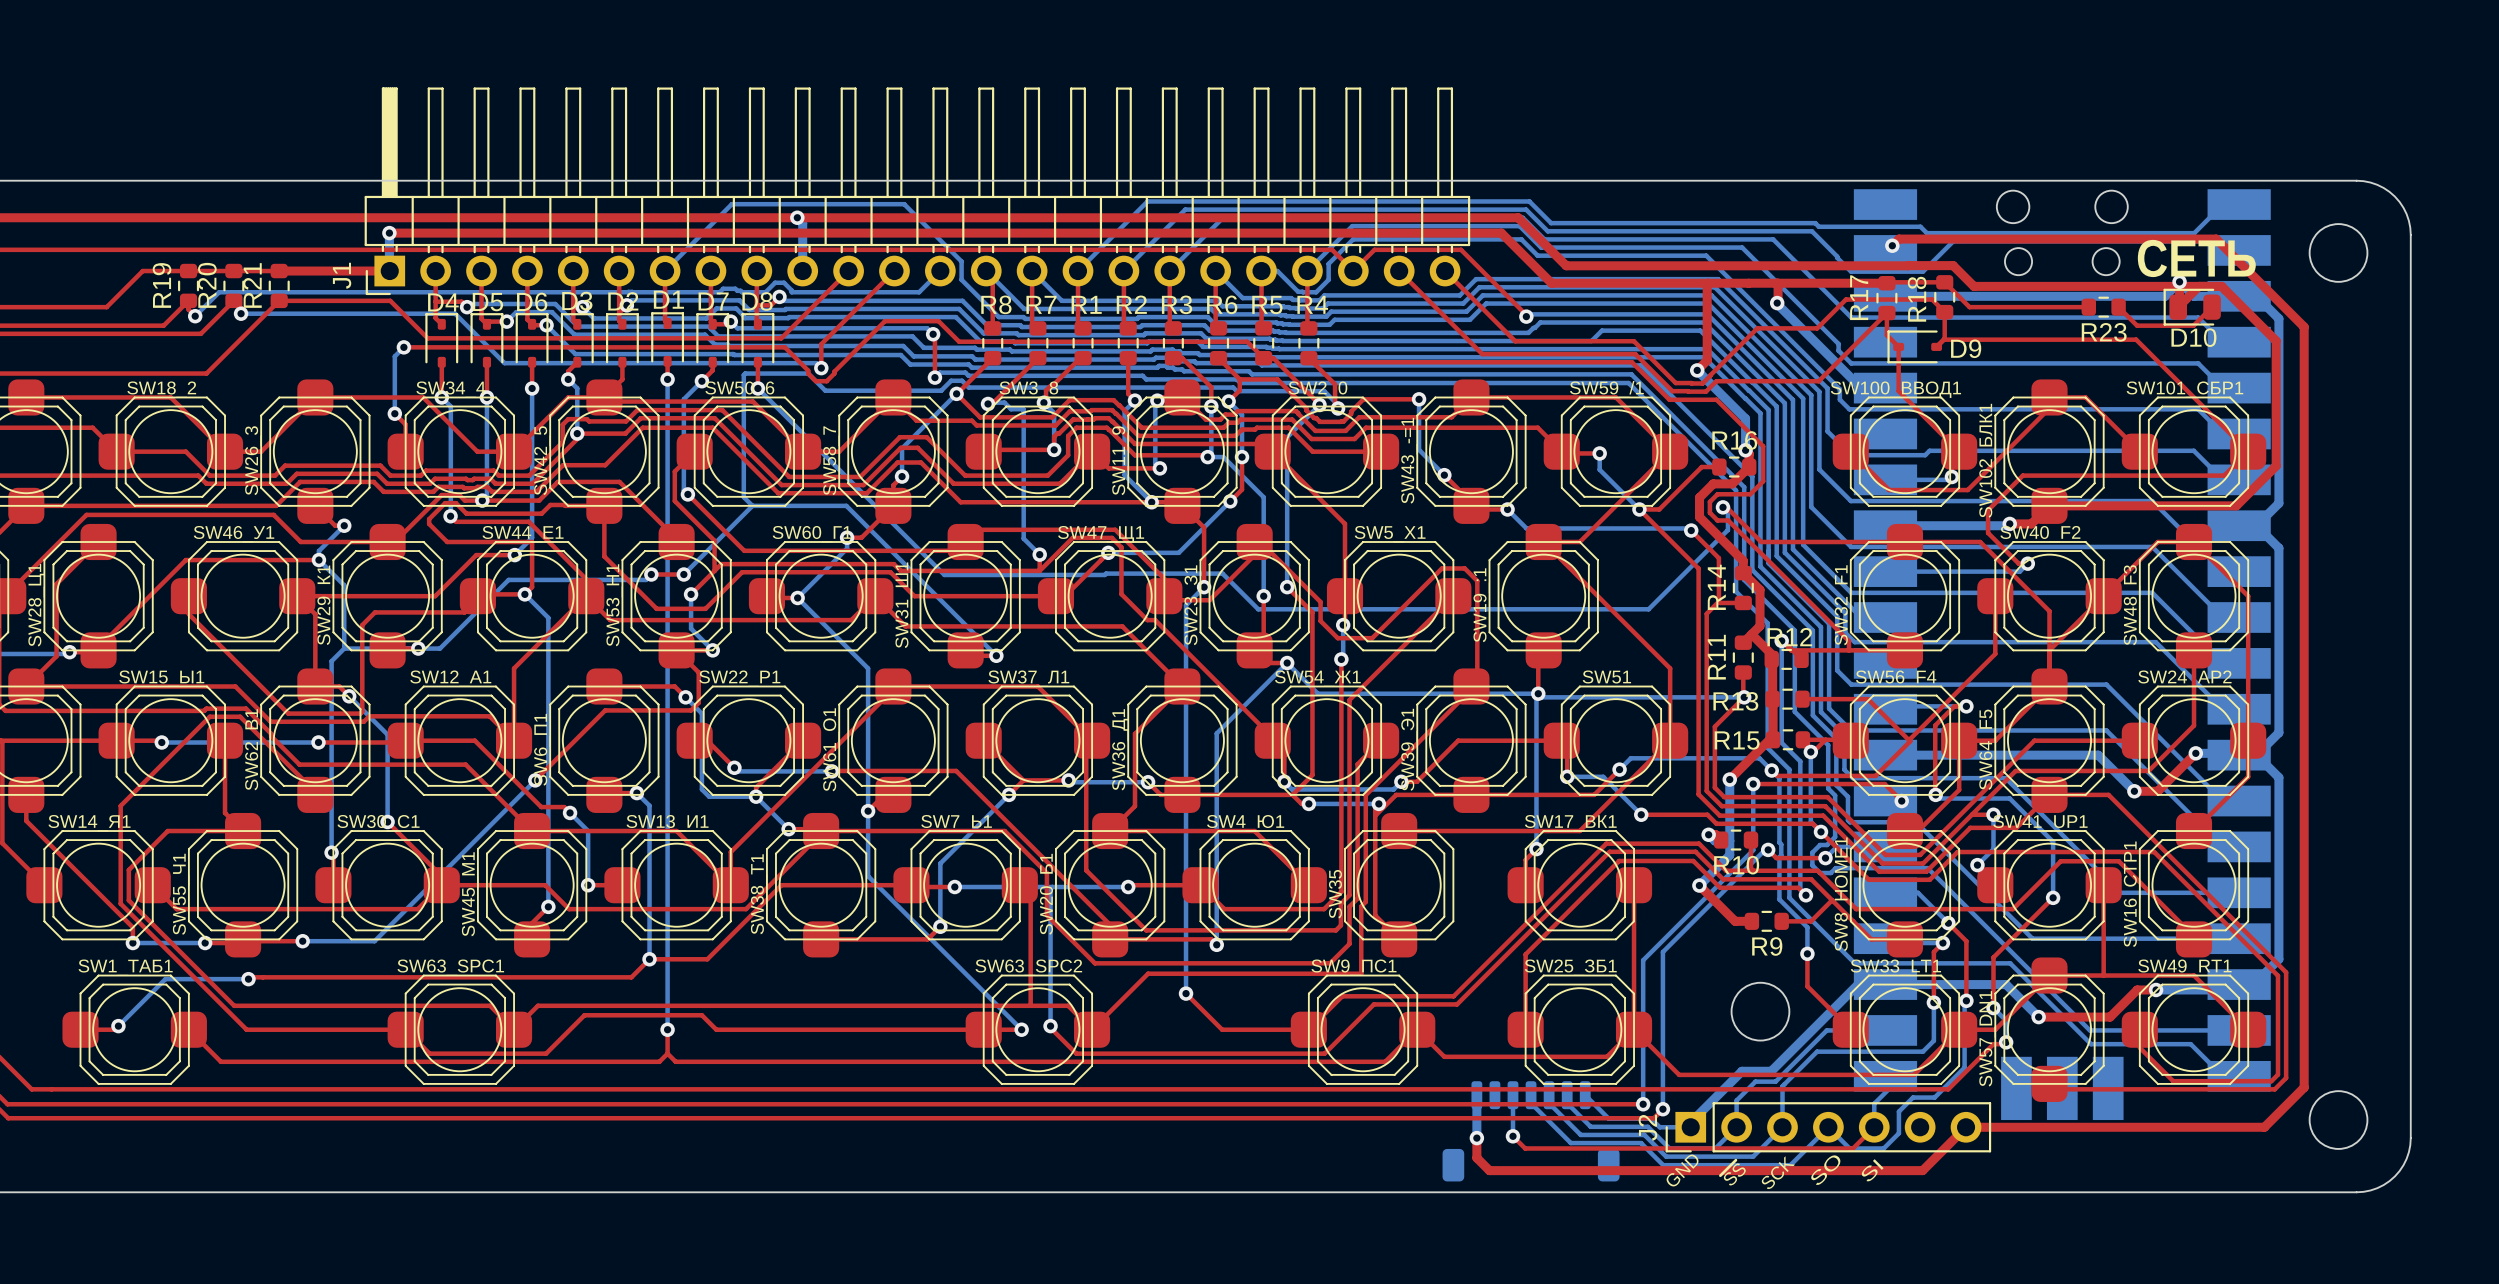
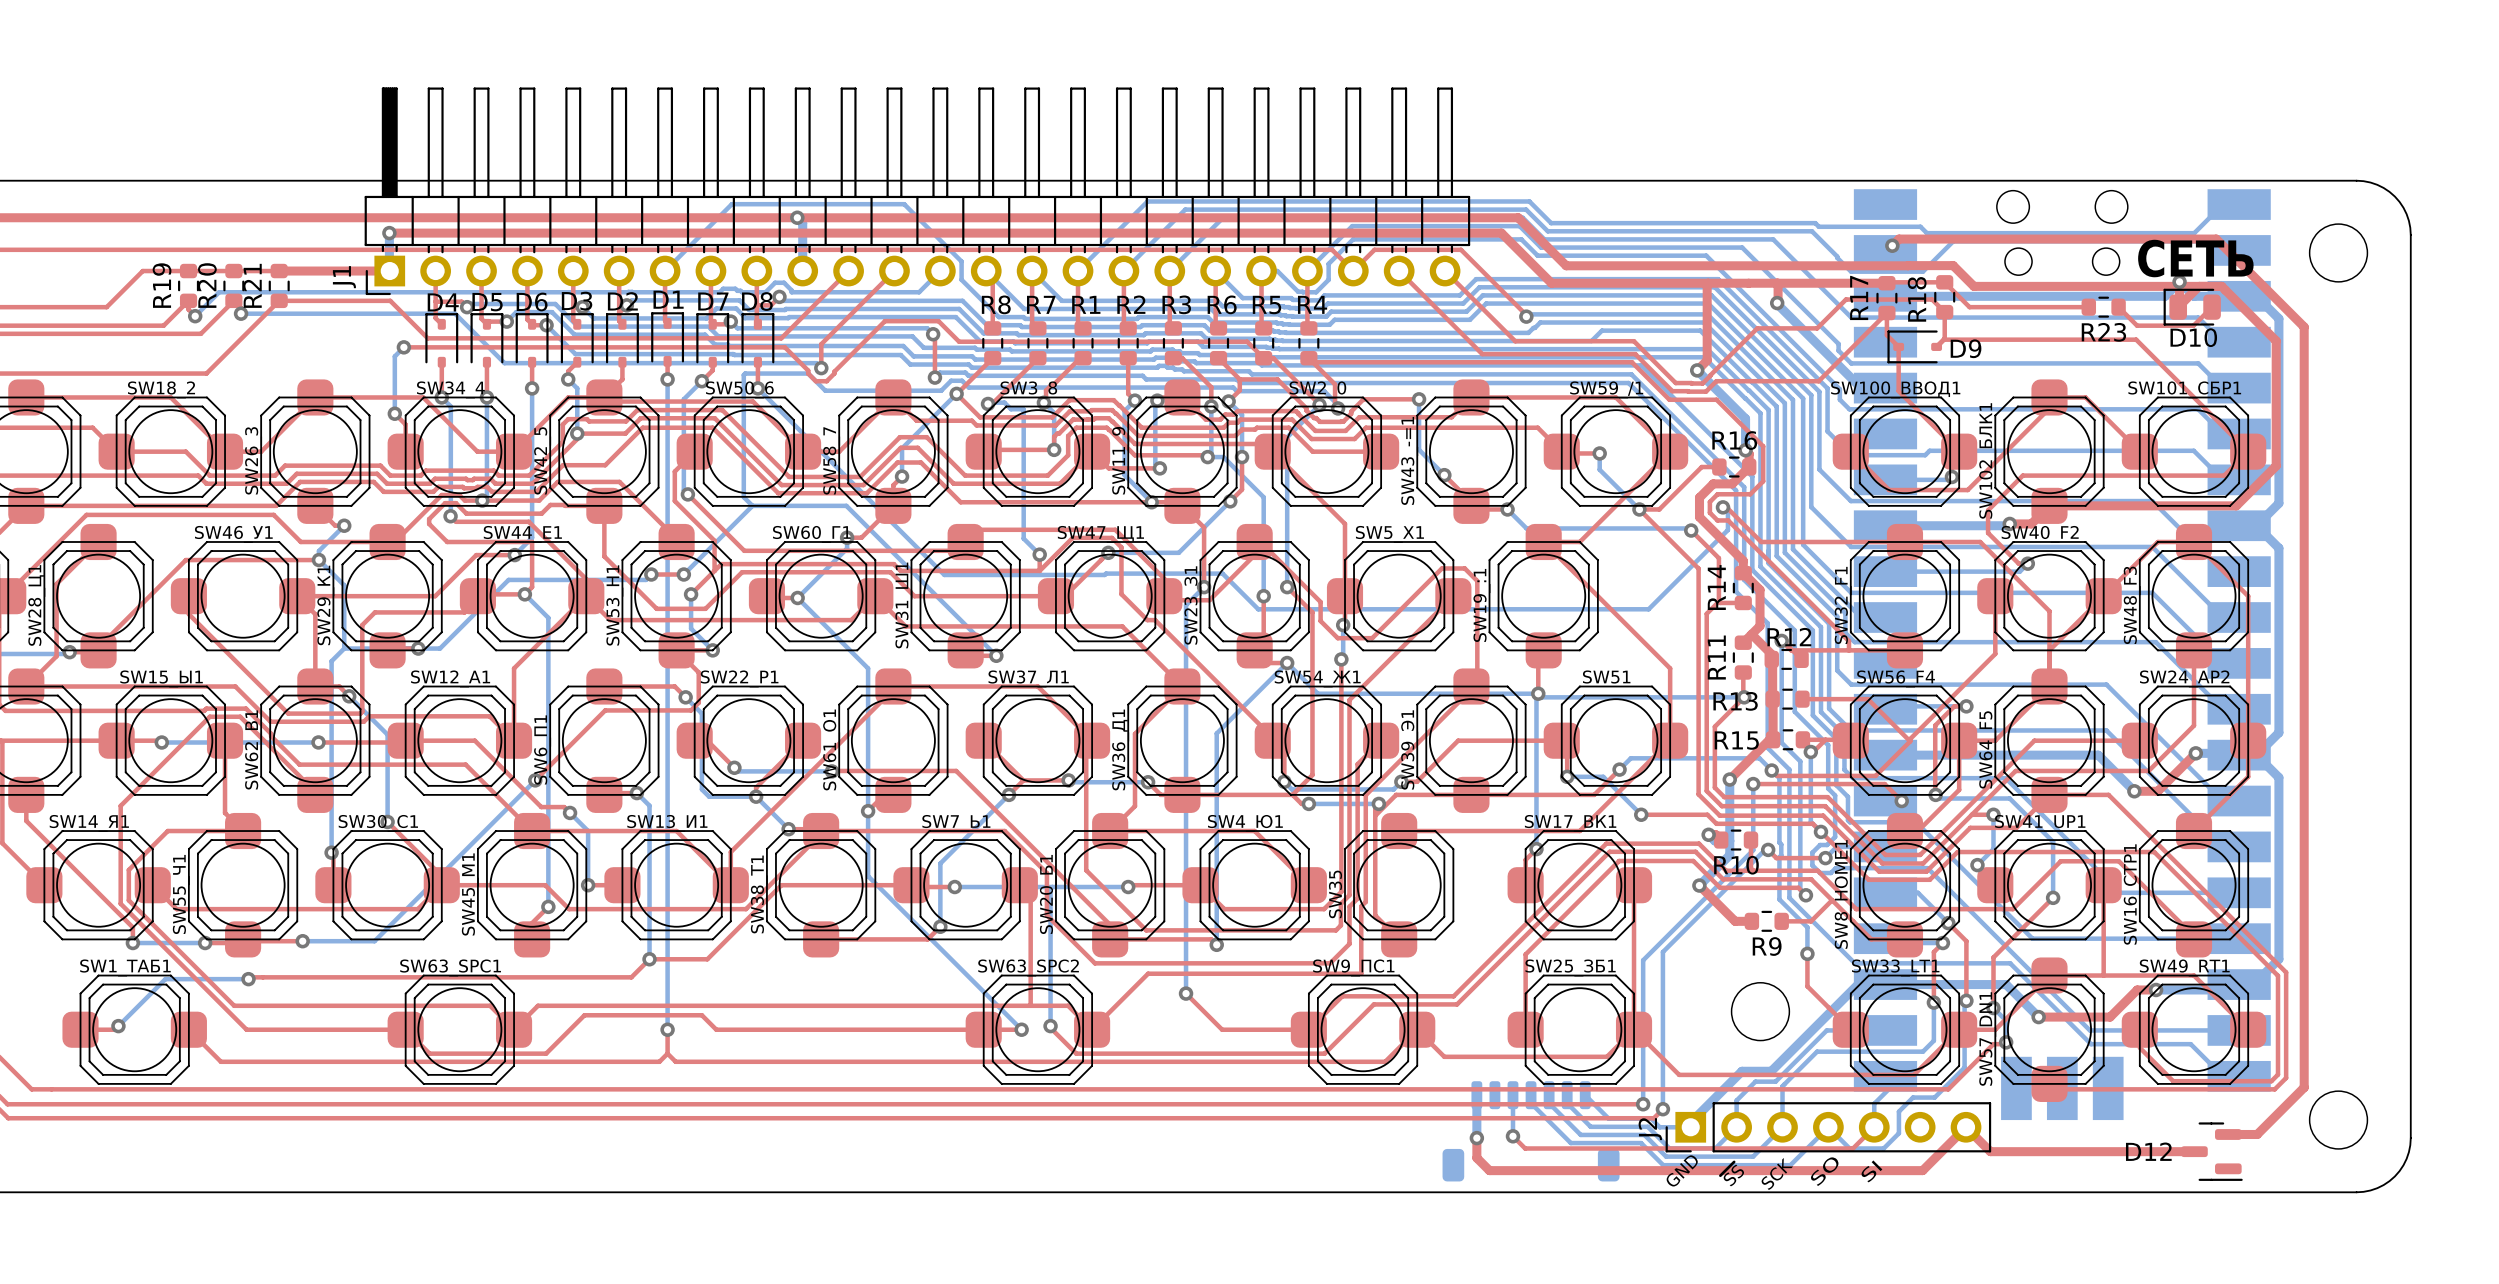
top track: (1966, 1127) (2264, 1127) -> (1966, 1127) (1990, 1151) (2194, 1151)
top track: none -> (2264, 1127) (2257, 1134) (2228, 1134)
D12: none -> (2211, 1151)

